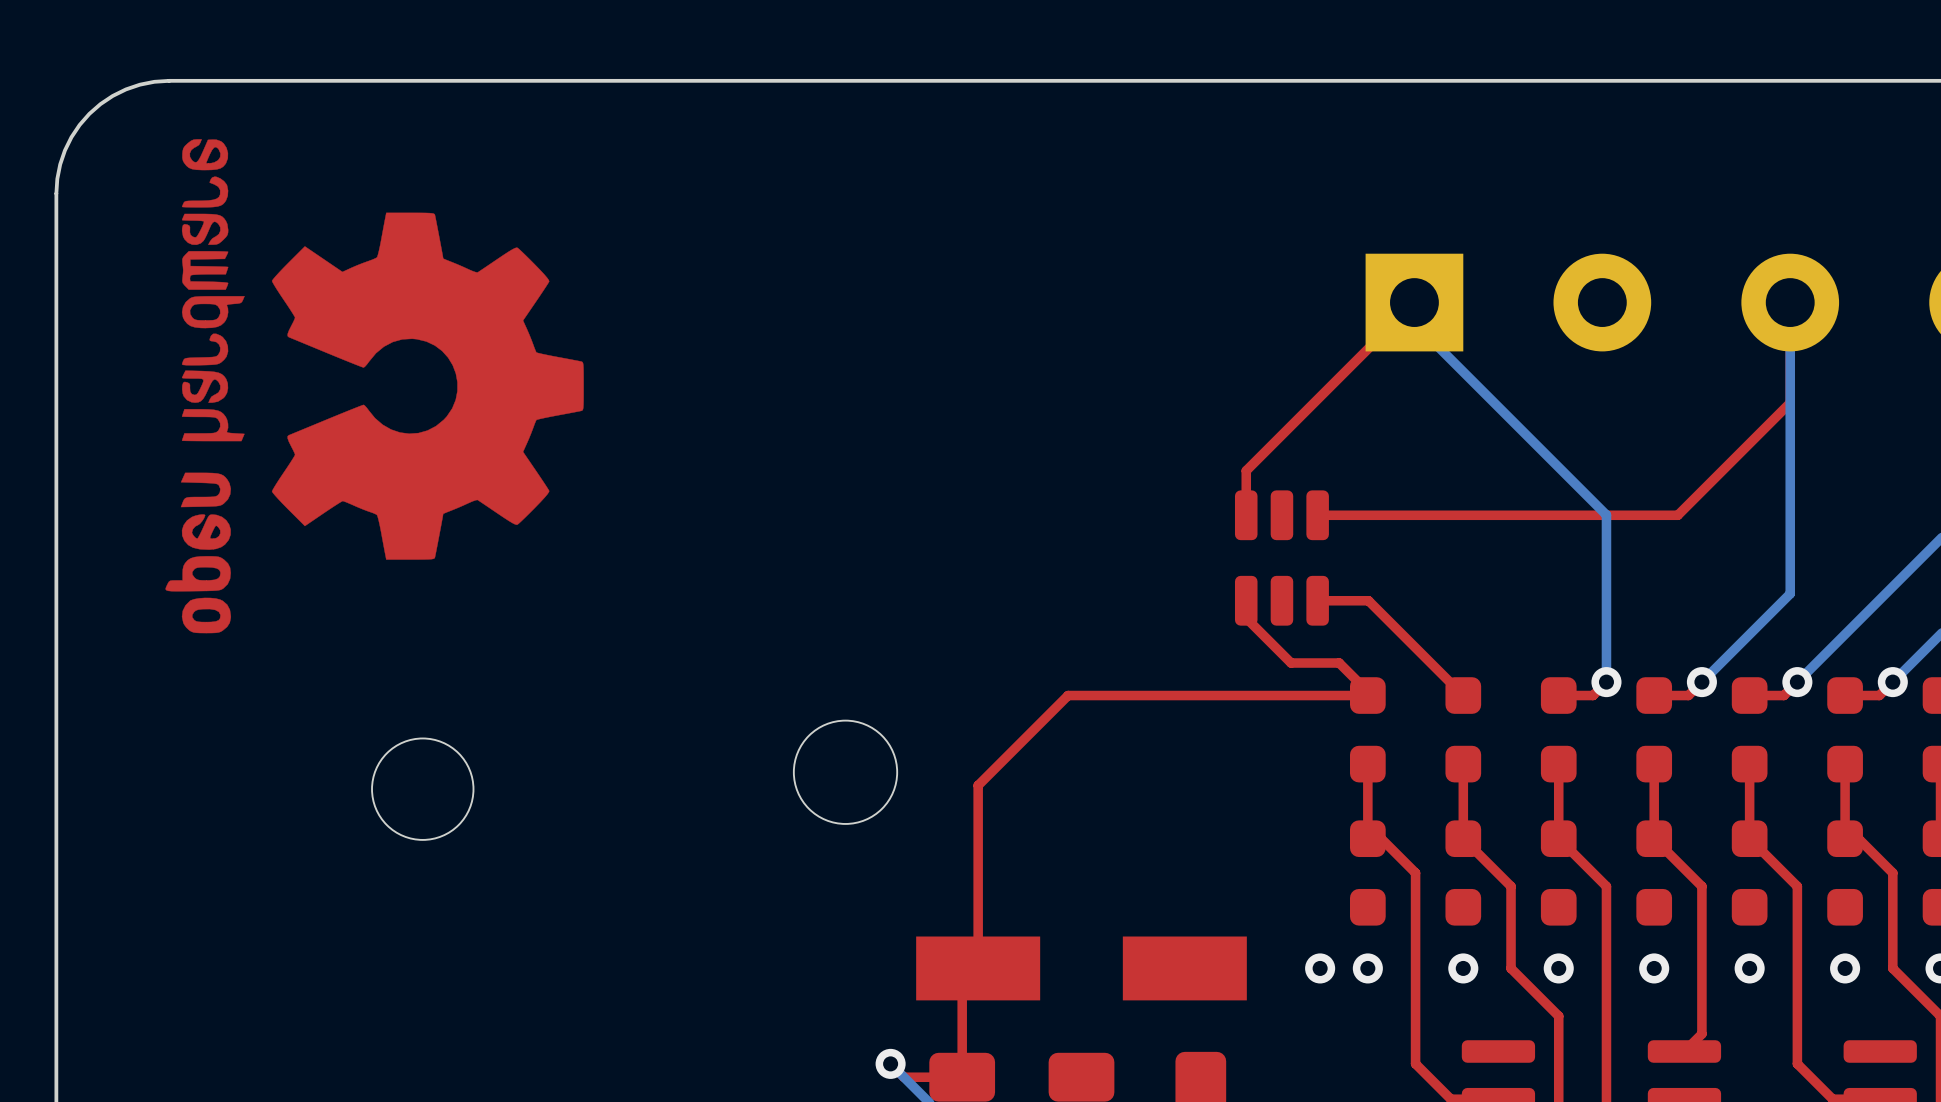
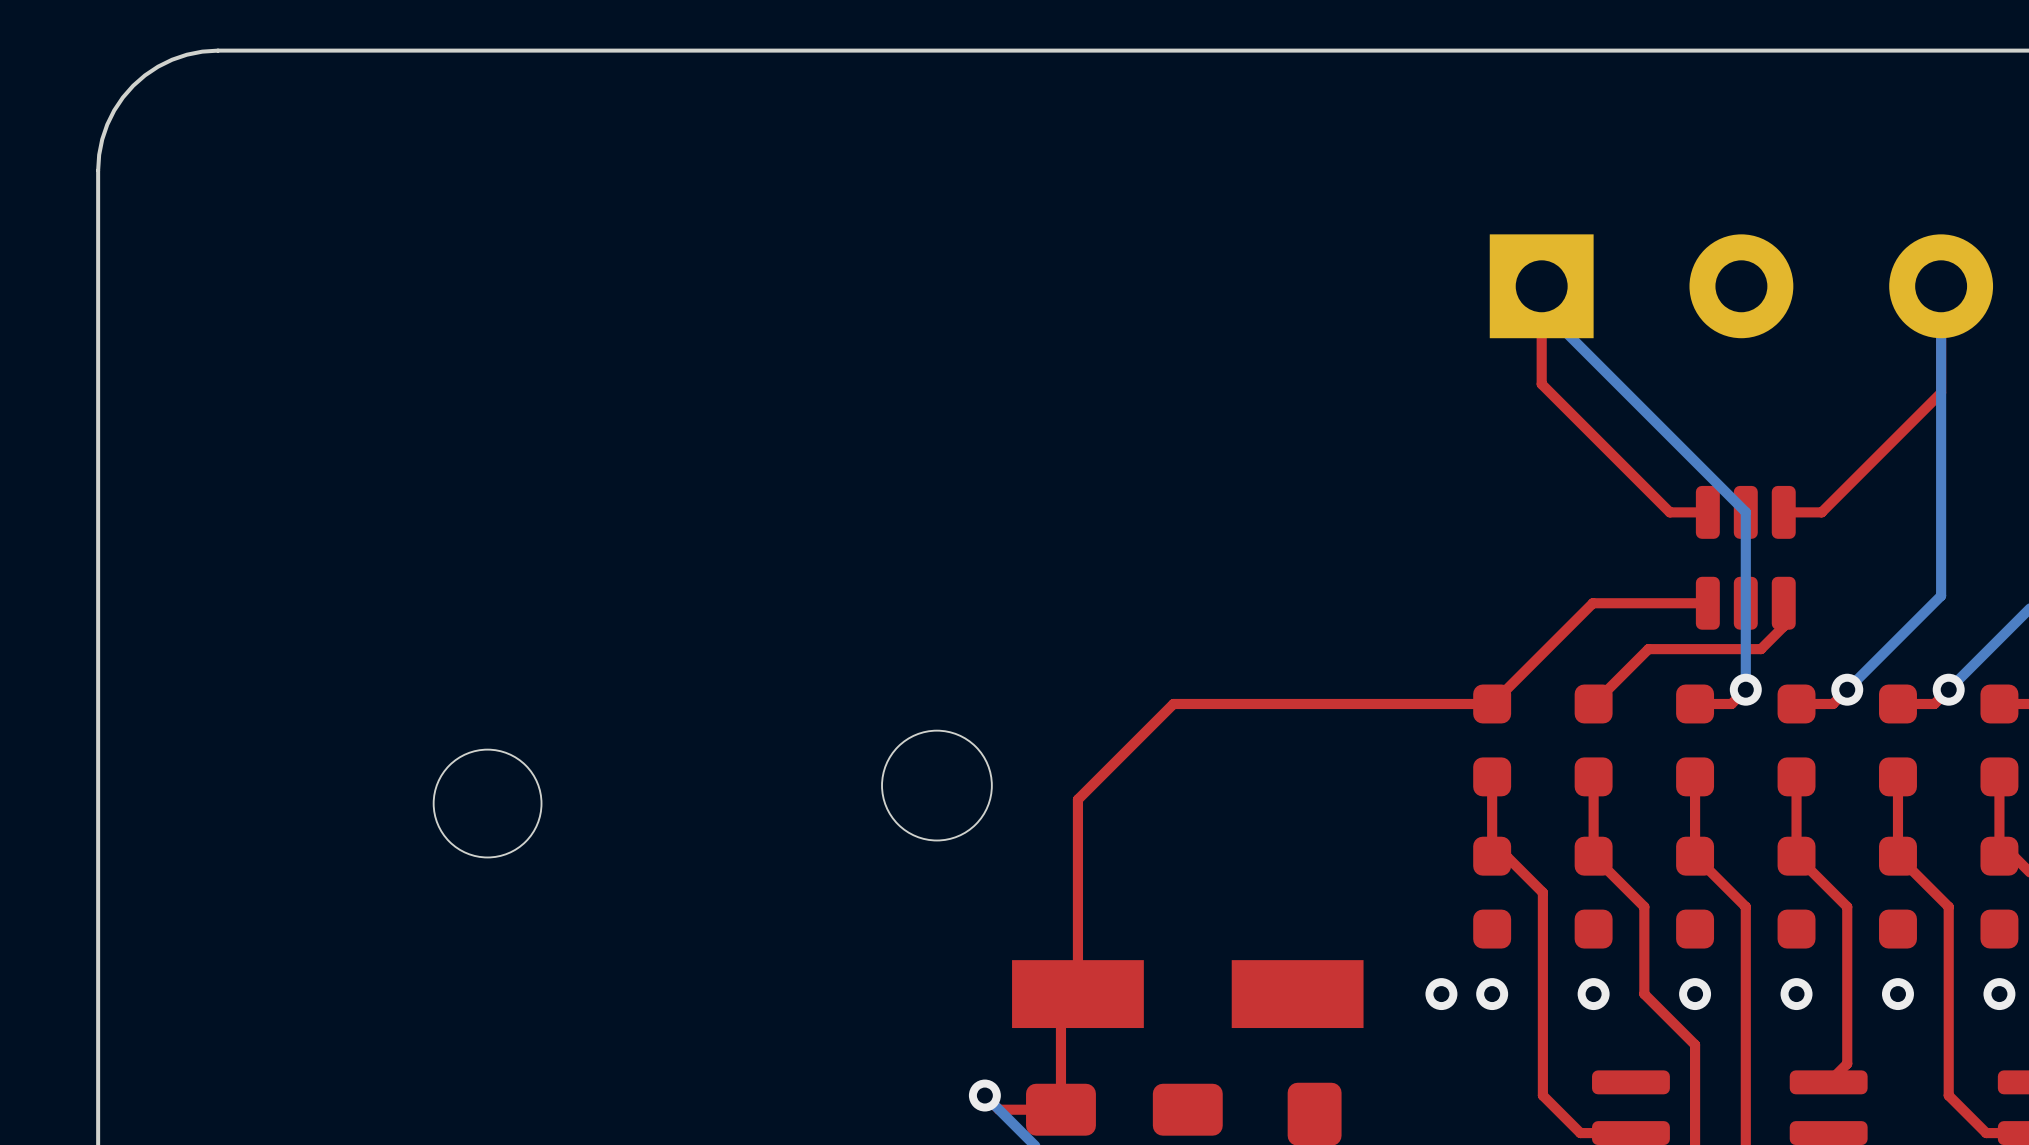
drawing: [165, 139, 584, 634] -> none
top track: (1414, 302) (1246, 470) (1246, 515) -> none
top track: (1535, 515) (1317, 515) -> (1669, 512) (1541, 384) (1541, 286)
top track: (1642, 515) (1570, 515) -> none
part position: (1281, 558) -> (1745, 557)
top track: (1246, 600) (1246, 618) (1291, 663) (1339, 663) (1367, 691) (1367, 695) -> (1707, 603) (1592, 603) (1492, 703)
top track: (1317, 600) (1368, 600) (1463, 695) -> (1783, 603) (1783, 626) (1761, 649) (1648, 649) (1593, 703)

